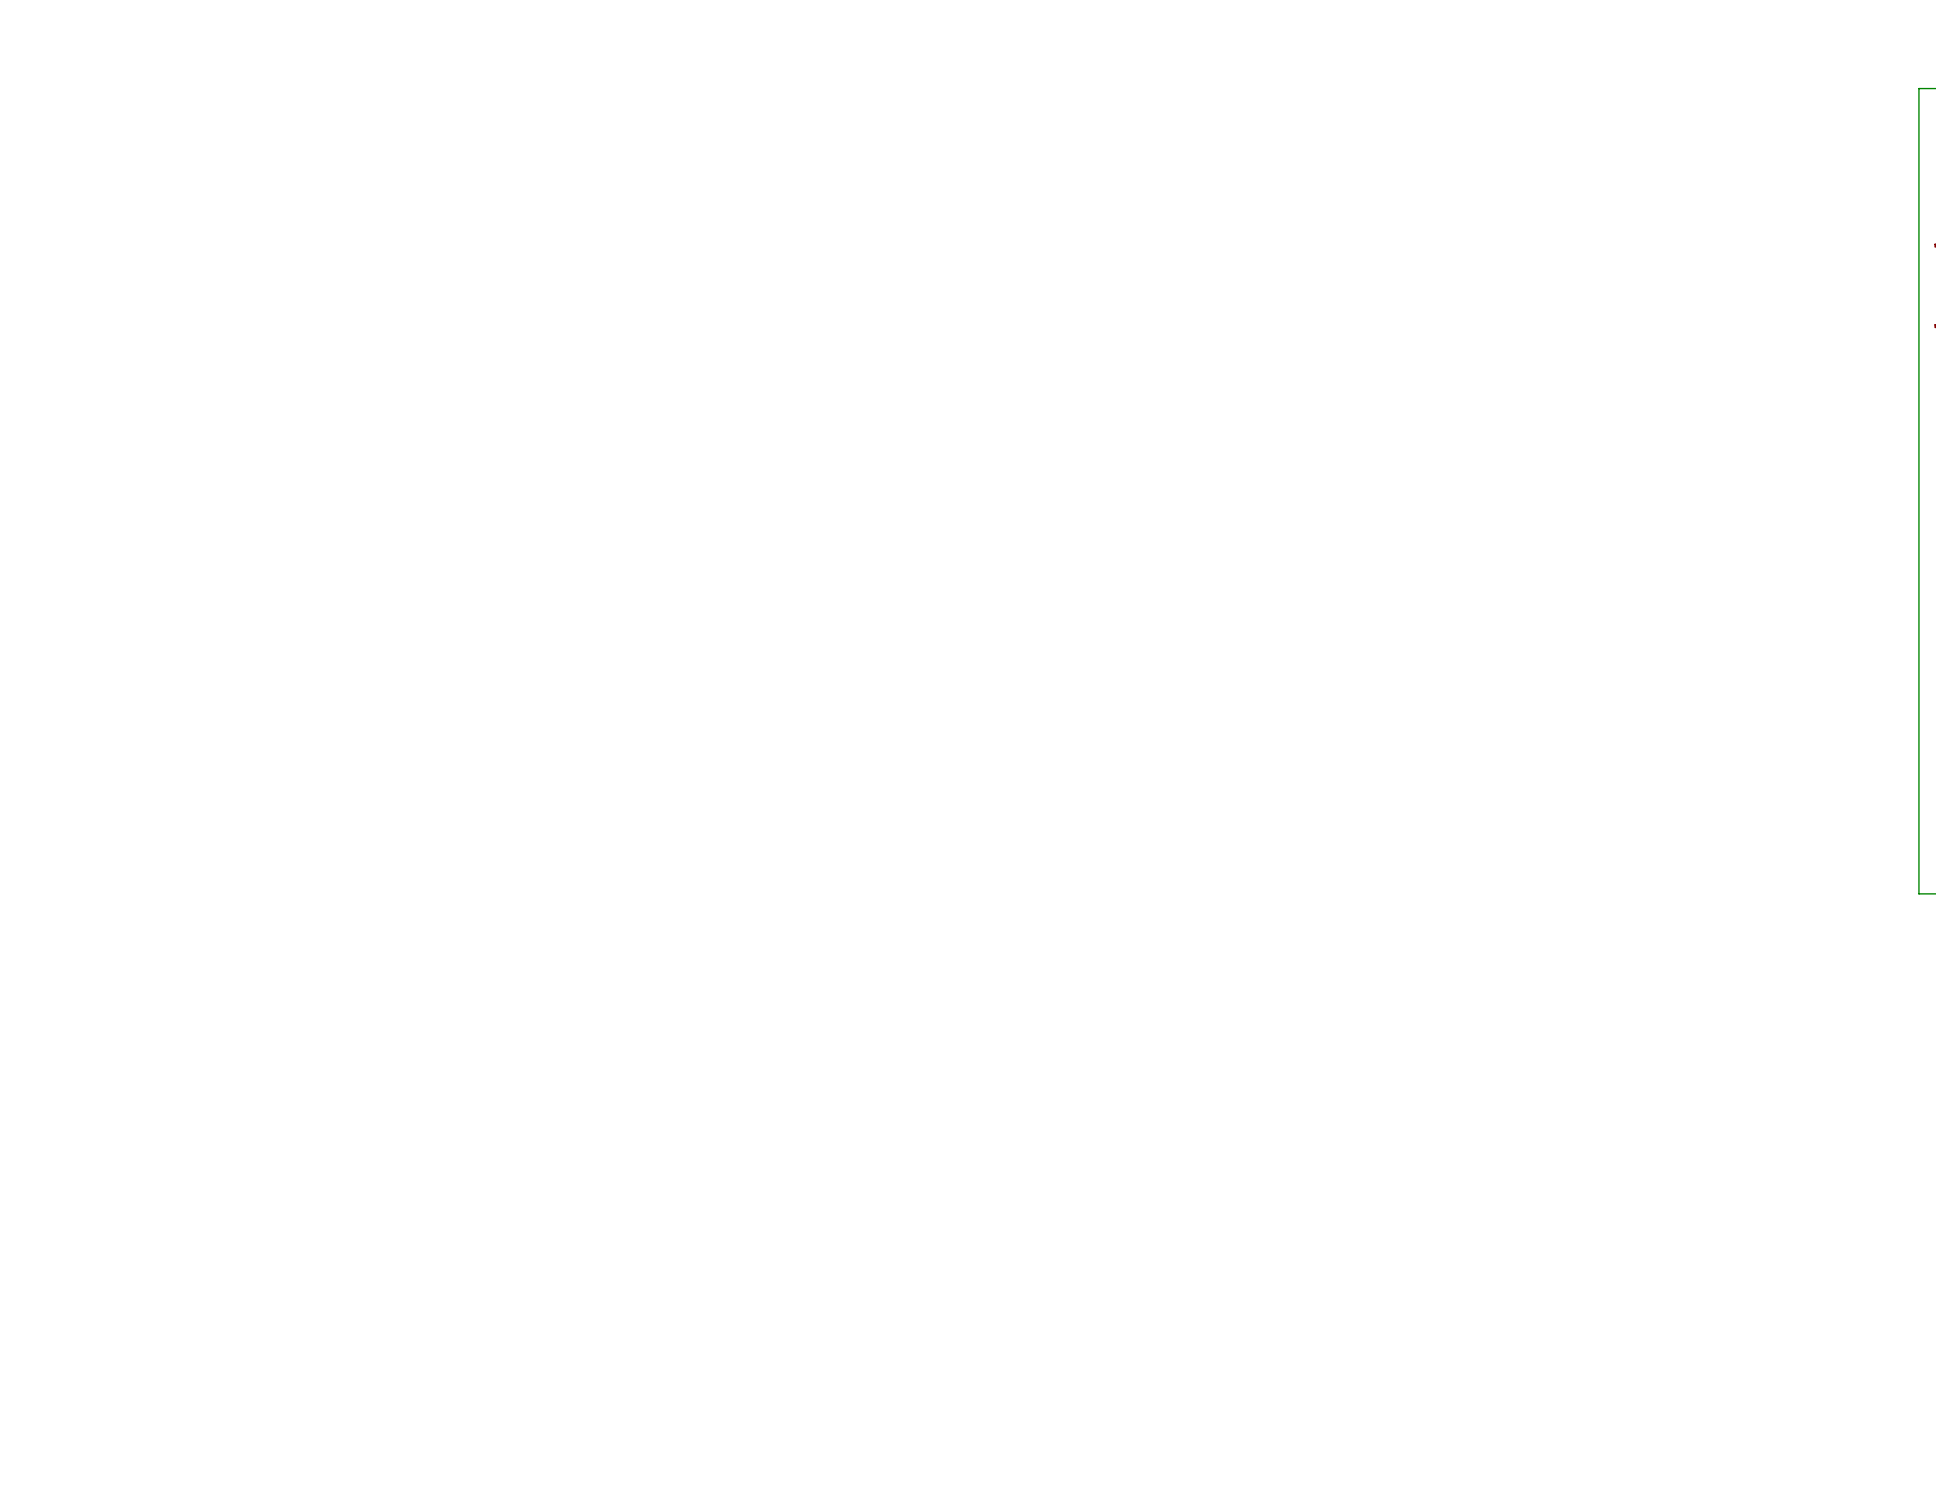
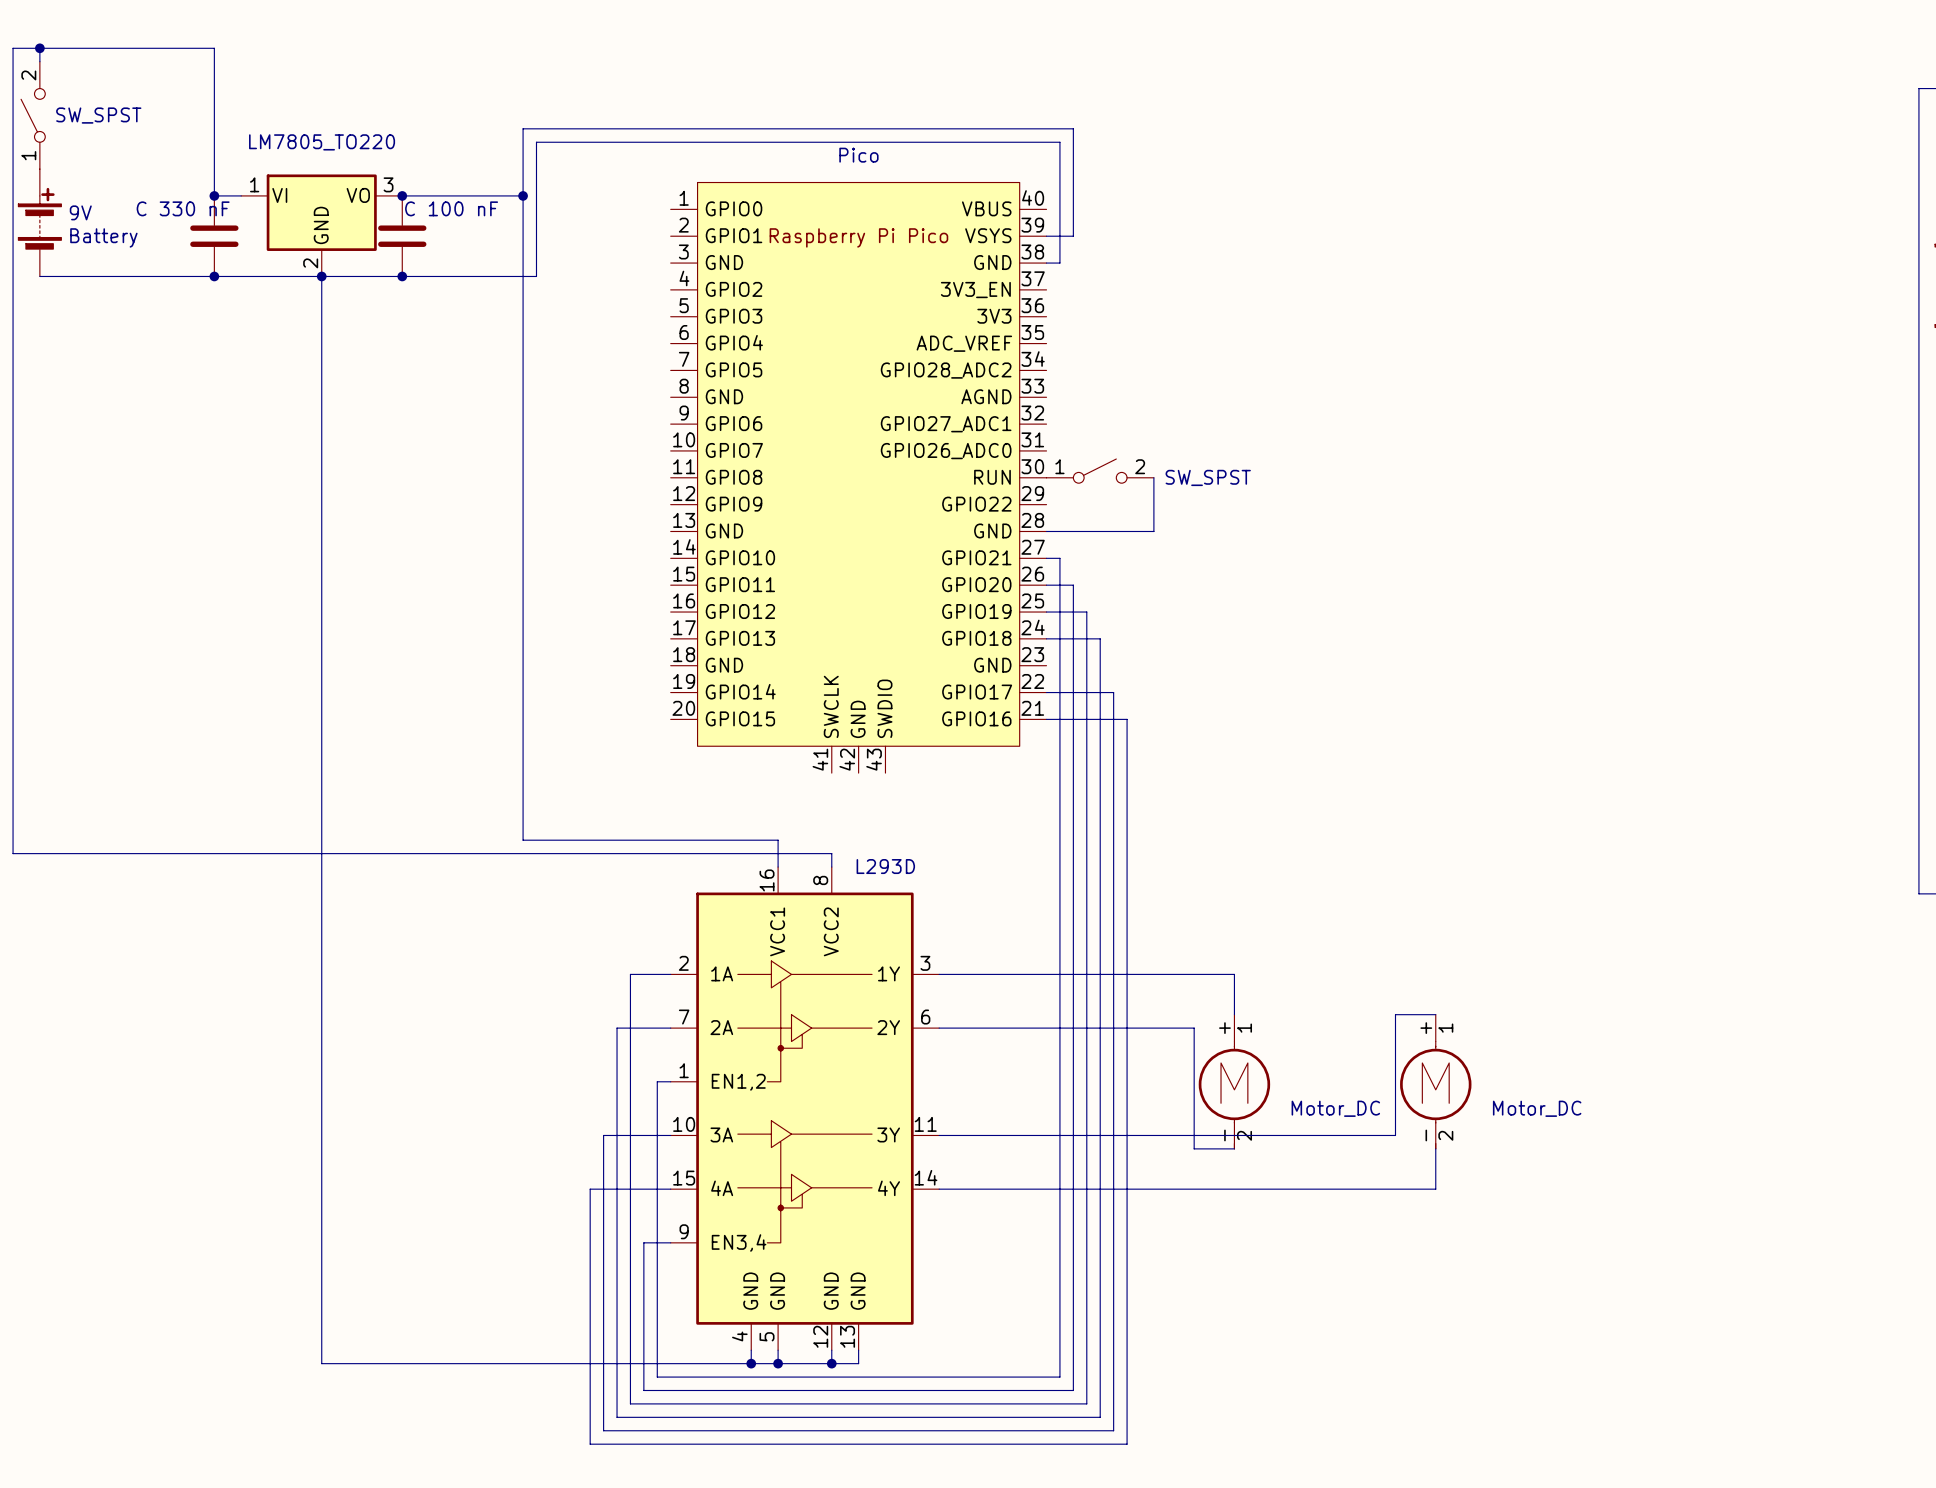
wire: none -> (39, 48) (39, 61)
junction: none -> (39, 48)
part: none -> SW_SPST (33, 115)
junction: none -> (214, 195)
wire: none -> (241, 195) (214, 195) (214, 48) (13, 48) (13, 853) (831, 853) (831, 867)
wire: none -> (402, 195) (523, 195)
junction: none -> (402, 195)
junction: none -> (523, 195)
part: none -> Battery (39, 222)
part: none -> LM7805_TO220 (321, 225)
part: none -> C 330 nF (214, 236)
part: none -> C 100 nF (402, 236)
wire: none -> (1046, 236) (1073, 236) (1073, 128) (523, 128) (523, 840) (778, 840) (778, 867)
wire: none -> (1046, 263) (1059, 263) (1059, 142) (536, 142) (536, 276) (39, 276)
junction: none -> (214, 276)
wire: none -> (321, 276) (321, 1363) (858, 1363) (858, 1350)
junction: none -> (321, 276)
junction: none -> (402, 276)
part: none -> SW_SPST (1100, 471)
part: none -> Pico (858, 477)
wire: none -> (1153, 477) (1153, 531) (1046, 531)
wire: none -> (1046, 558) (1059, 558) (1059, 1377) (657, 1377) (657, 1081) (670, 1081)
wire: none -> (1046, 585) (1073, 585) (1073, 1390) (643, 1390) (643, 1242) (670, 1242)
wire: none -> (1046, 612) (1086, 612) (1086, 1403) (630, 1403) (630, 974) (670, 974)
wire: none -> (1046, 638) (1100, 638) (1100, 1417) (617, 1417) (617, 1028) (670, 1028)
wire: none -> (1046, 692) (1113, 692) (1113, 1430) (603, 1430) (603, 1135) (670, 1135)
wire: none -> (1046, 719) (1127, 719) (1127, 1444) (590, 1444) (590, 1189) (670, 1189)
wire: none -> (939, 974) (1234, 974) (1234, 1014)
wire: none -> (1435, 1014) (1395, 1014) (1395, 1135) (939, 1135)
wire: none -> (939, 1028) (1194, 1028) (1194, 1148) (1234, 1148)
part: none -> Motor_DC (1234, 1081)
part: none -> Motor_DC (1435, 1081)
part: none -> L293D (804, 1108)
wire: none -> (1435, 1148) (1435, 1189) (939, 1189)
wire: none -> (751, 1350) (751, 1363)
wire: none -> (778, 1350) (778, 1363)
wire: none -> (831, 1350) (831, 1363)
junction: none -> (751, 1363)
junction: none -> (778, 1363)
junction: none -> (831, 1363)

